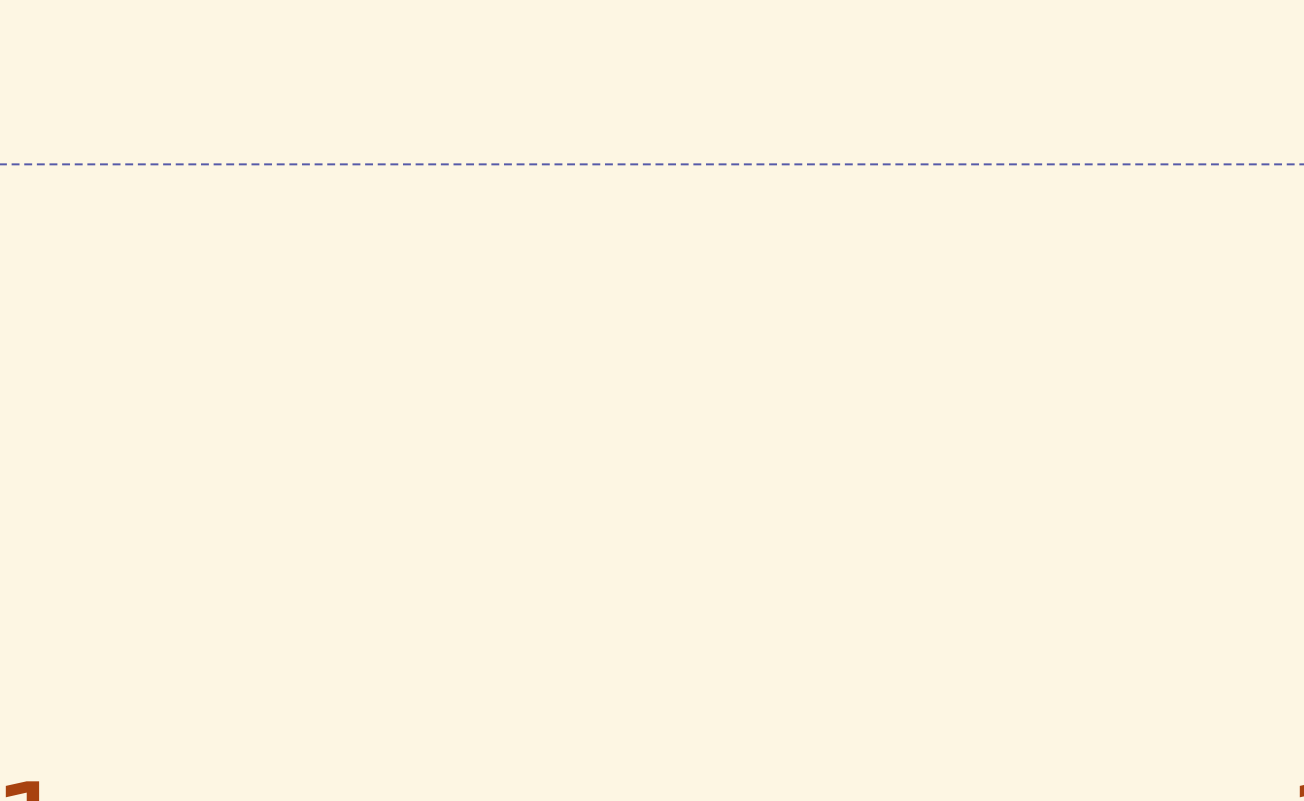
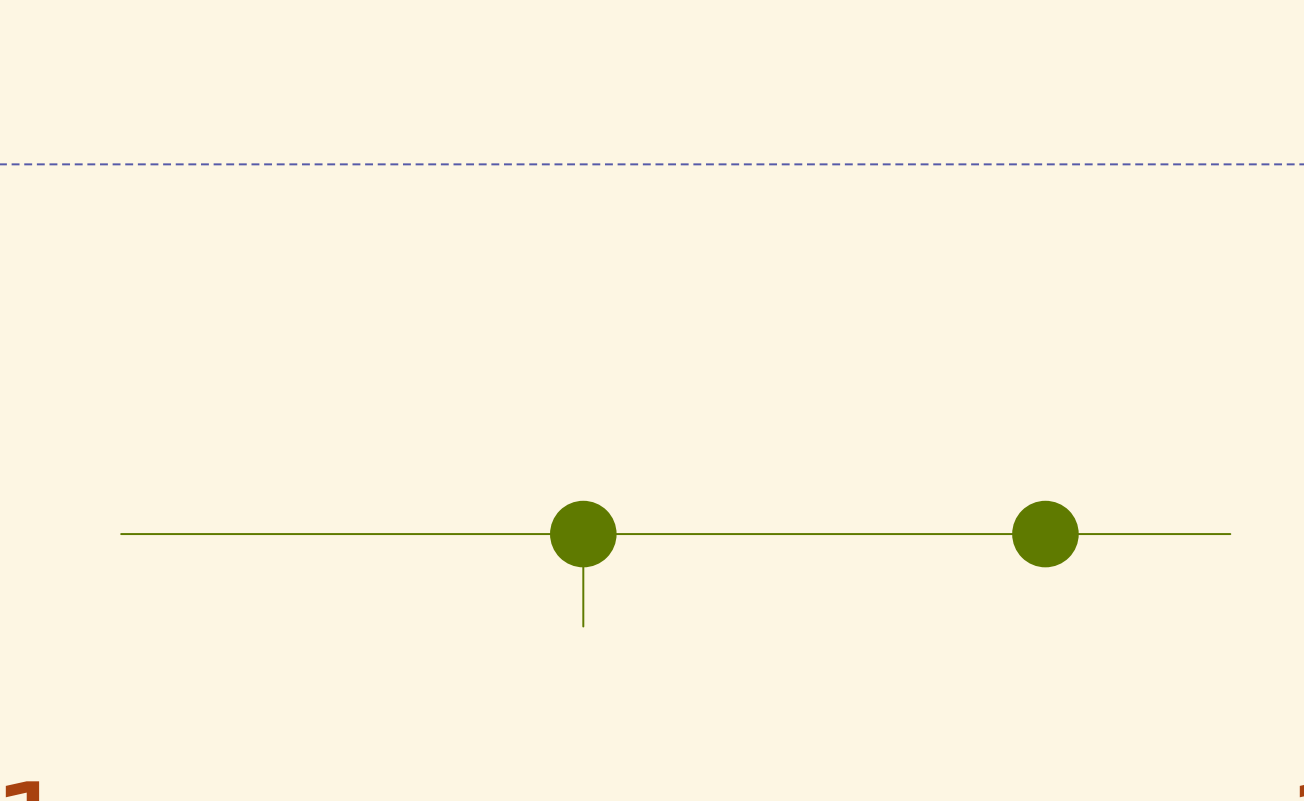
wire: none -> (121, 534) (1230, 534)
wire: none -> (583, 534) (583, 626)
junction: none -> (583, 534)
junction: none -> (1045, 534)

